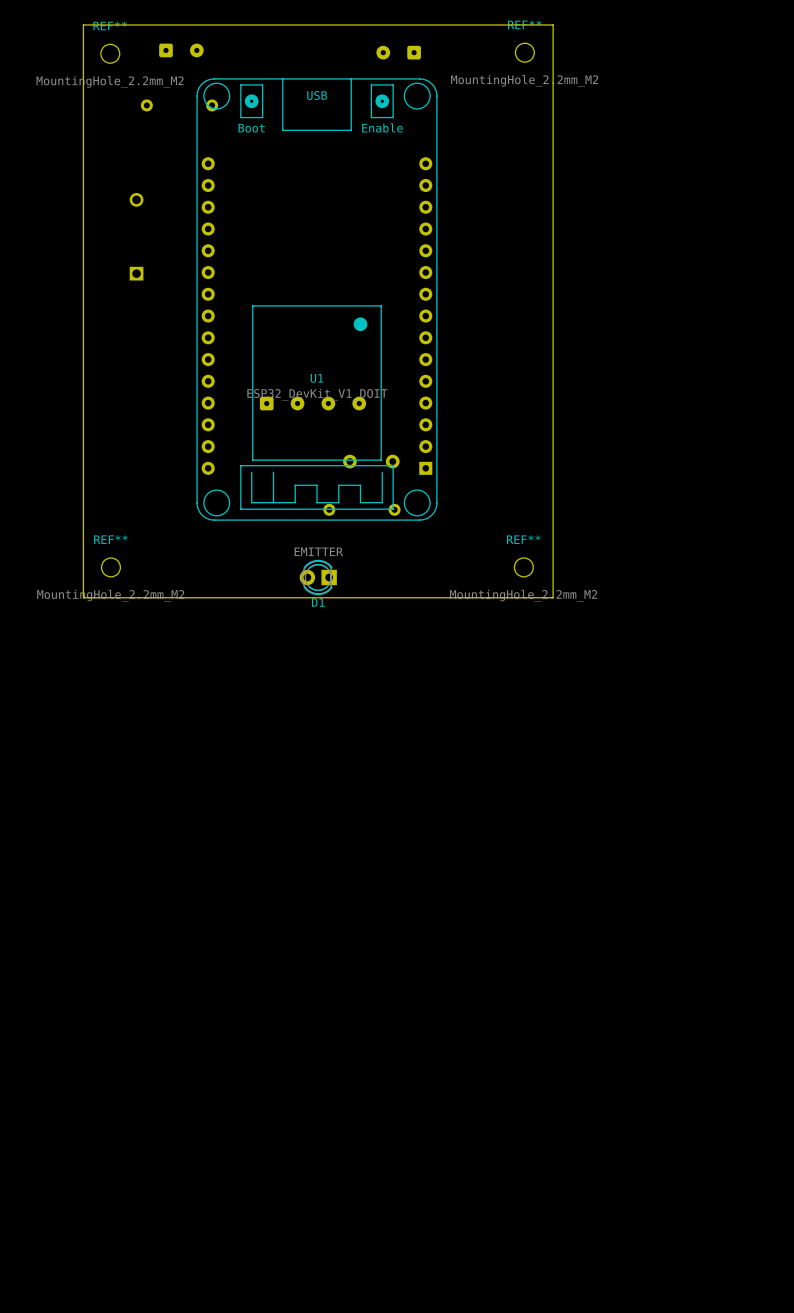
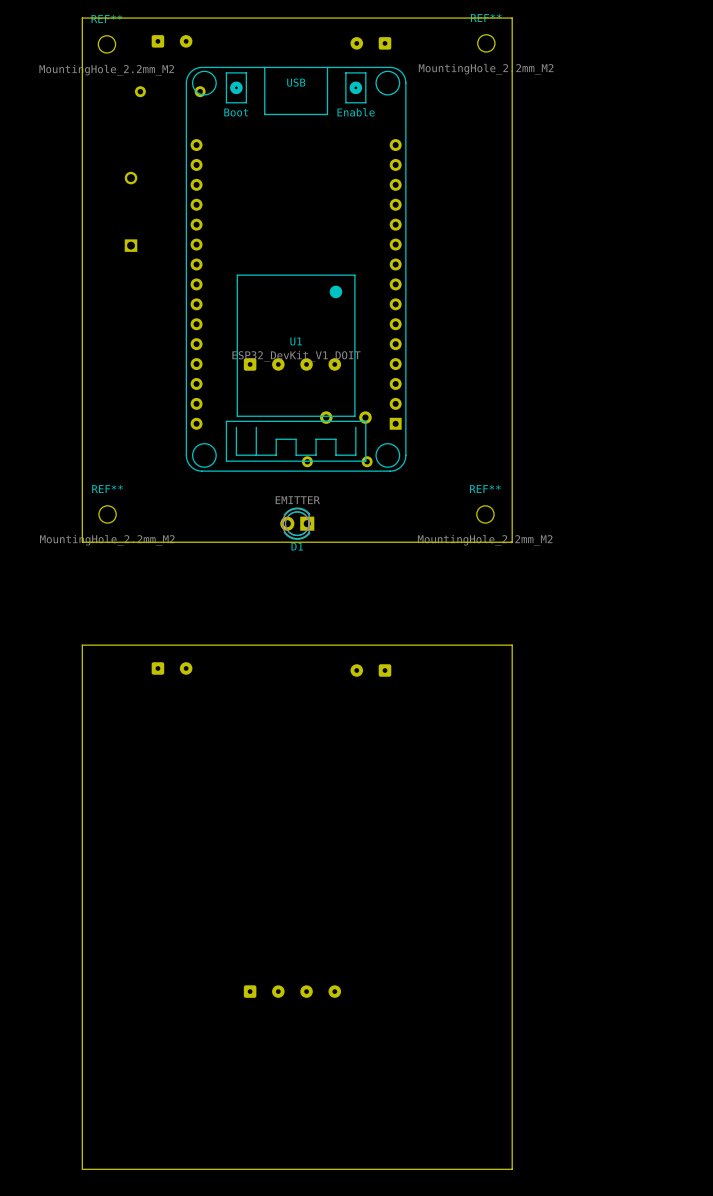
board edge: none -> (82, 645) (82, 1169) (512, 1169) (512, 645) (82, 645)
part: none -> (172, 668)
part: none -> (370, 670)
part: none -> (292, 991)

